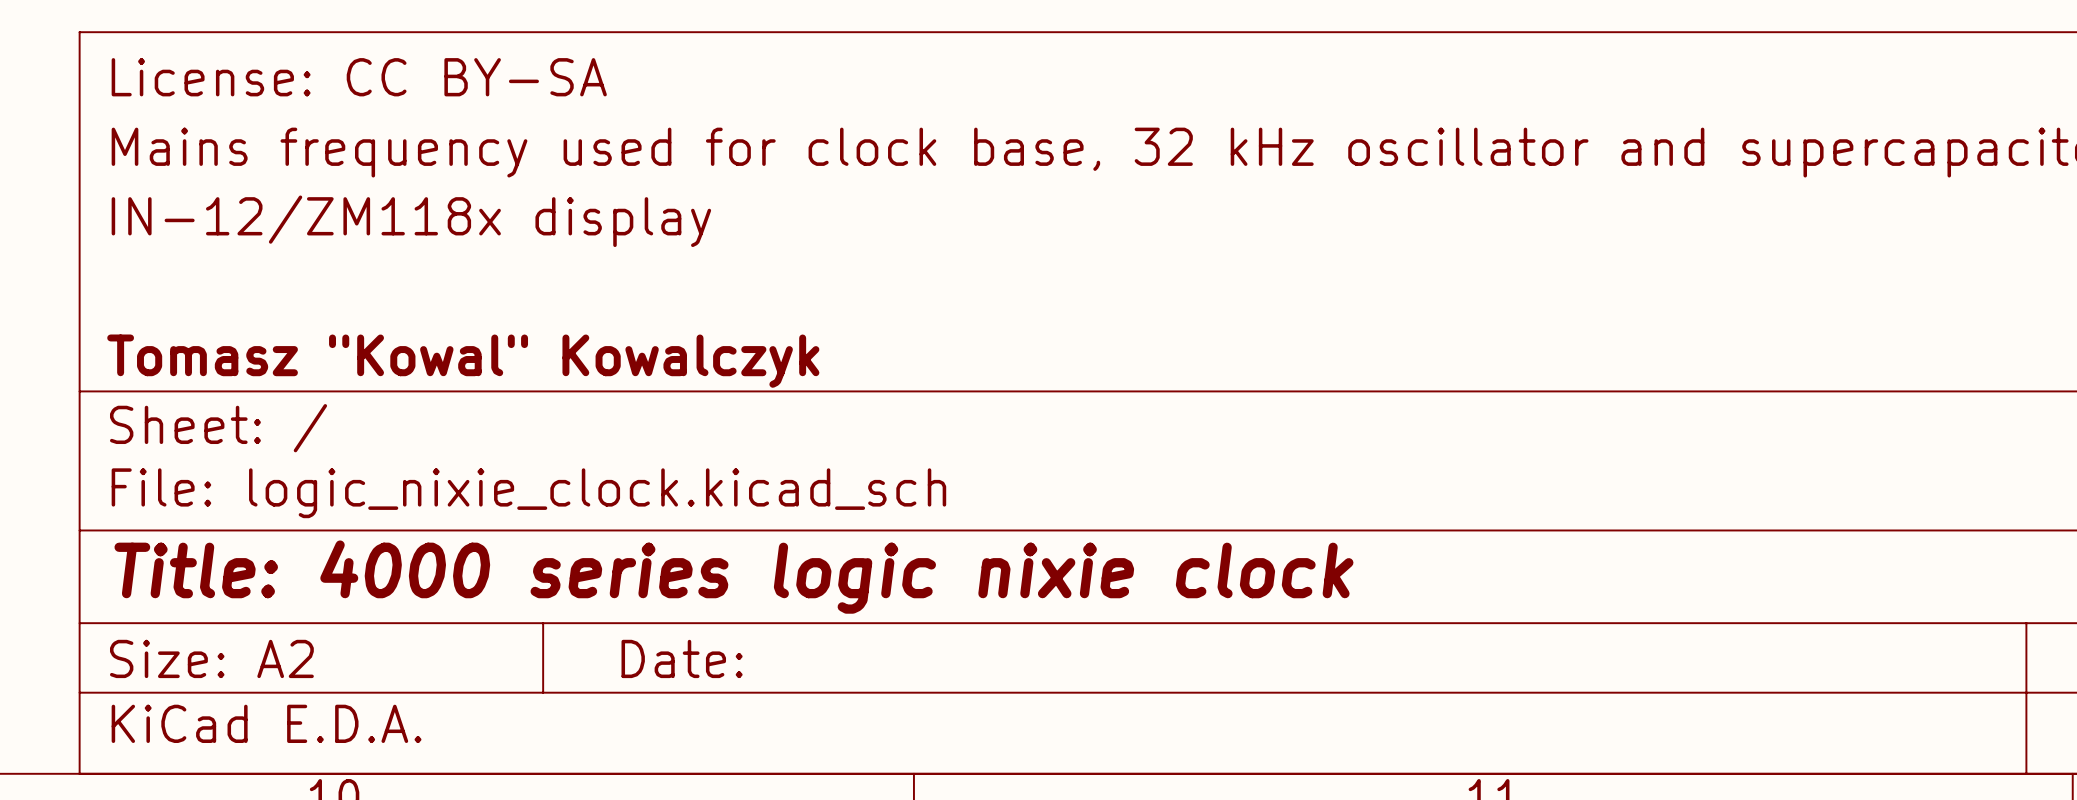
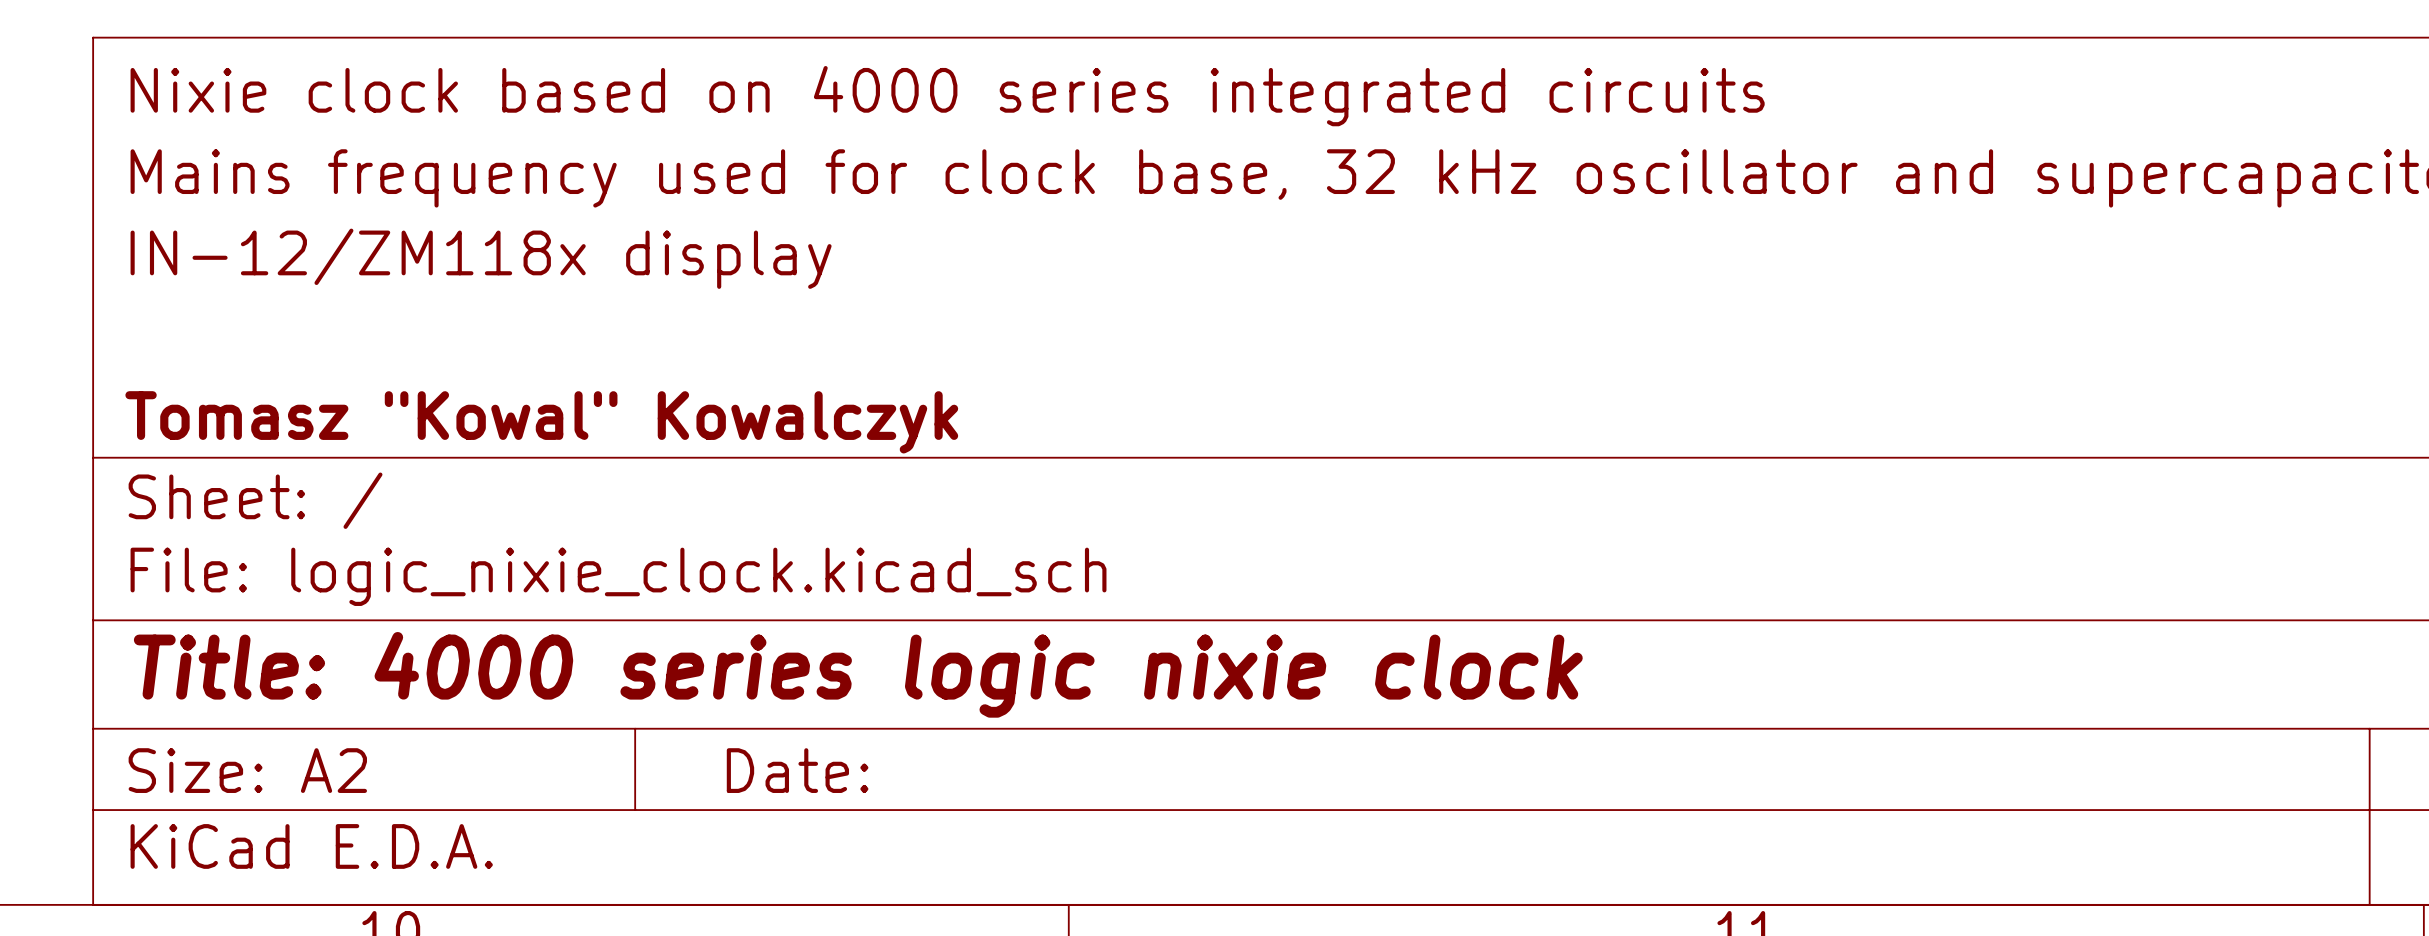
title block: License: CC BY-SA (359, 77) -> Nixie clock based on 4000 series integrated circuits (947, 96)

